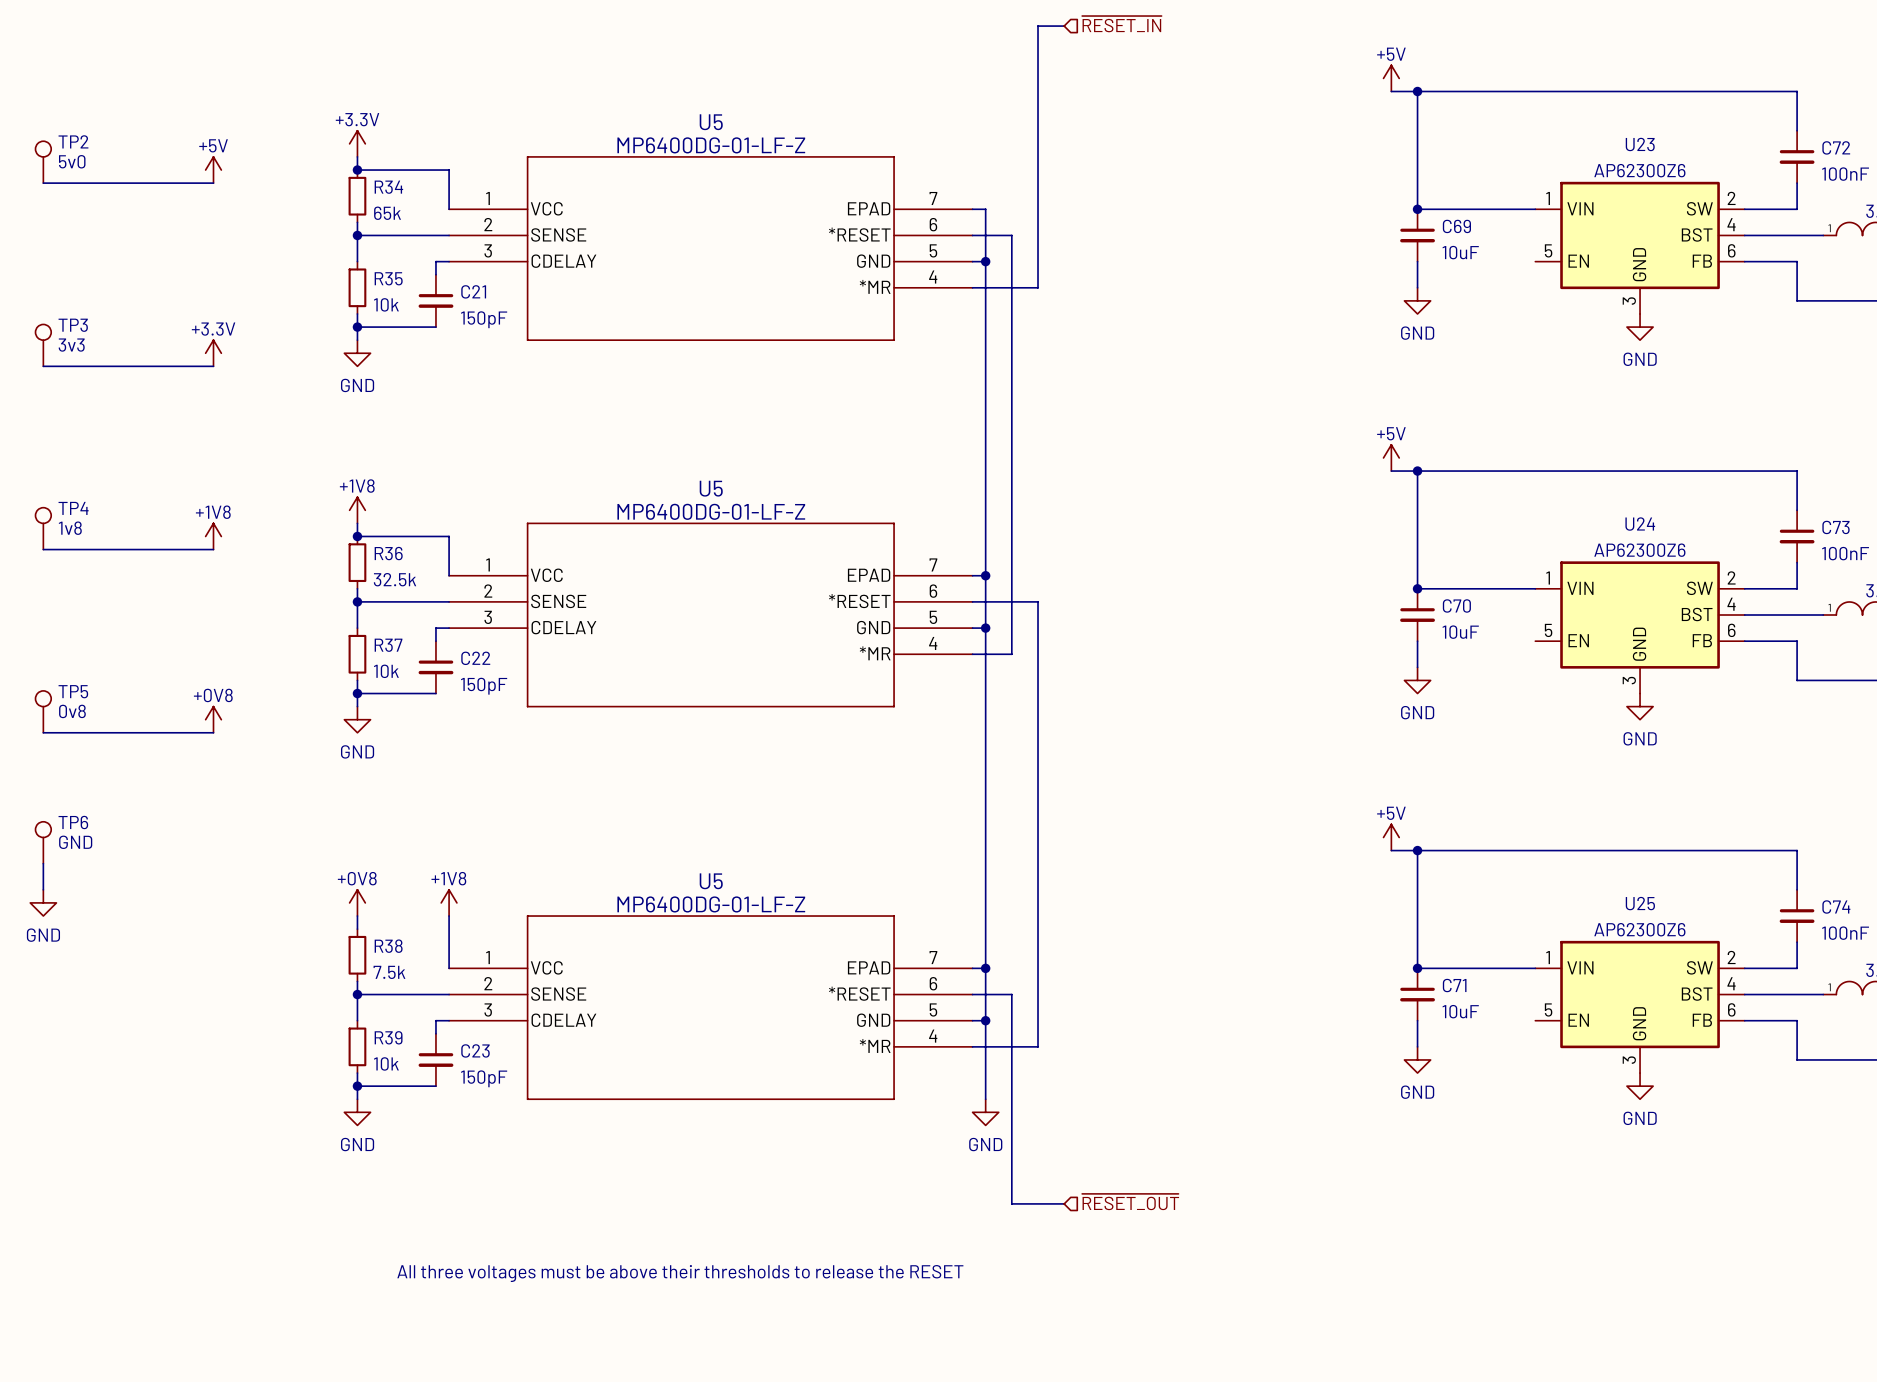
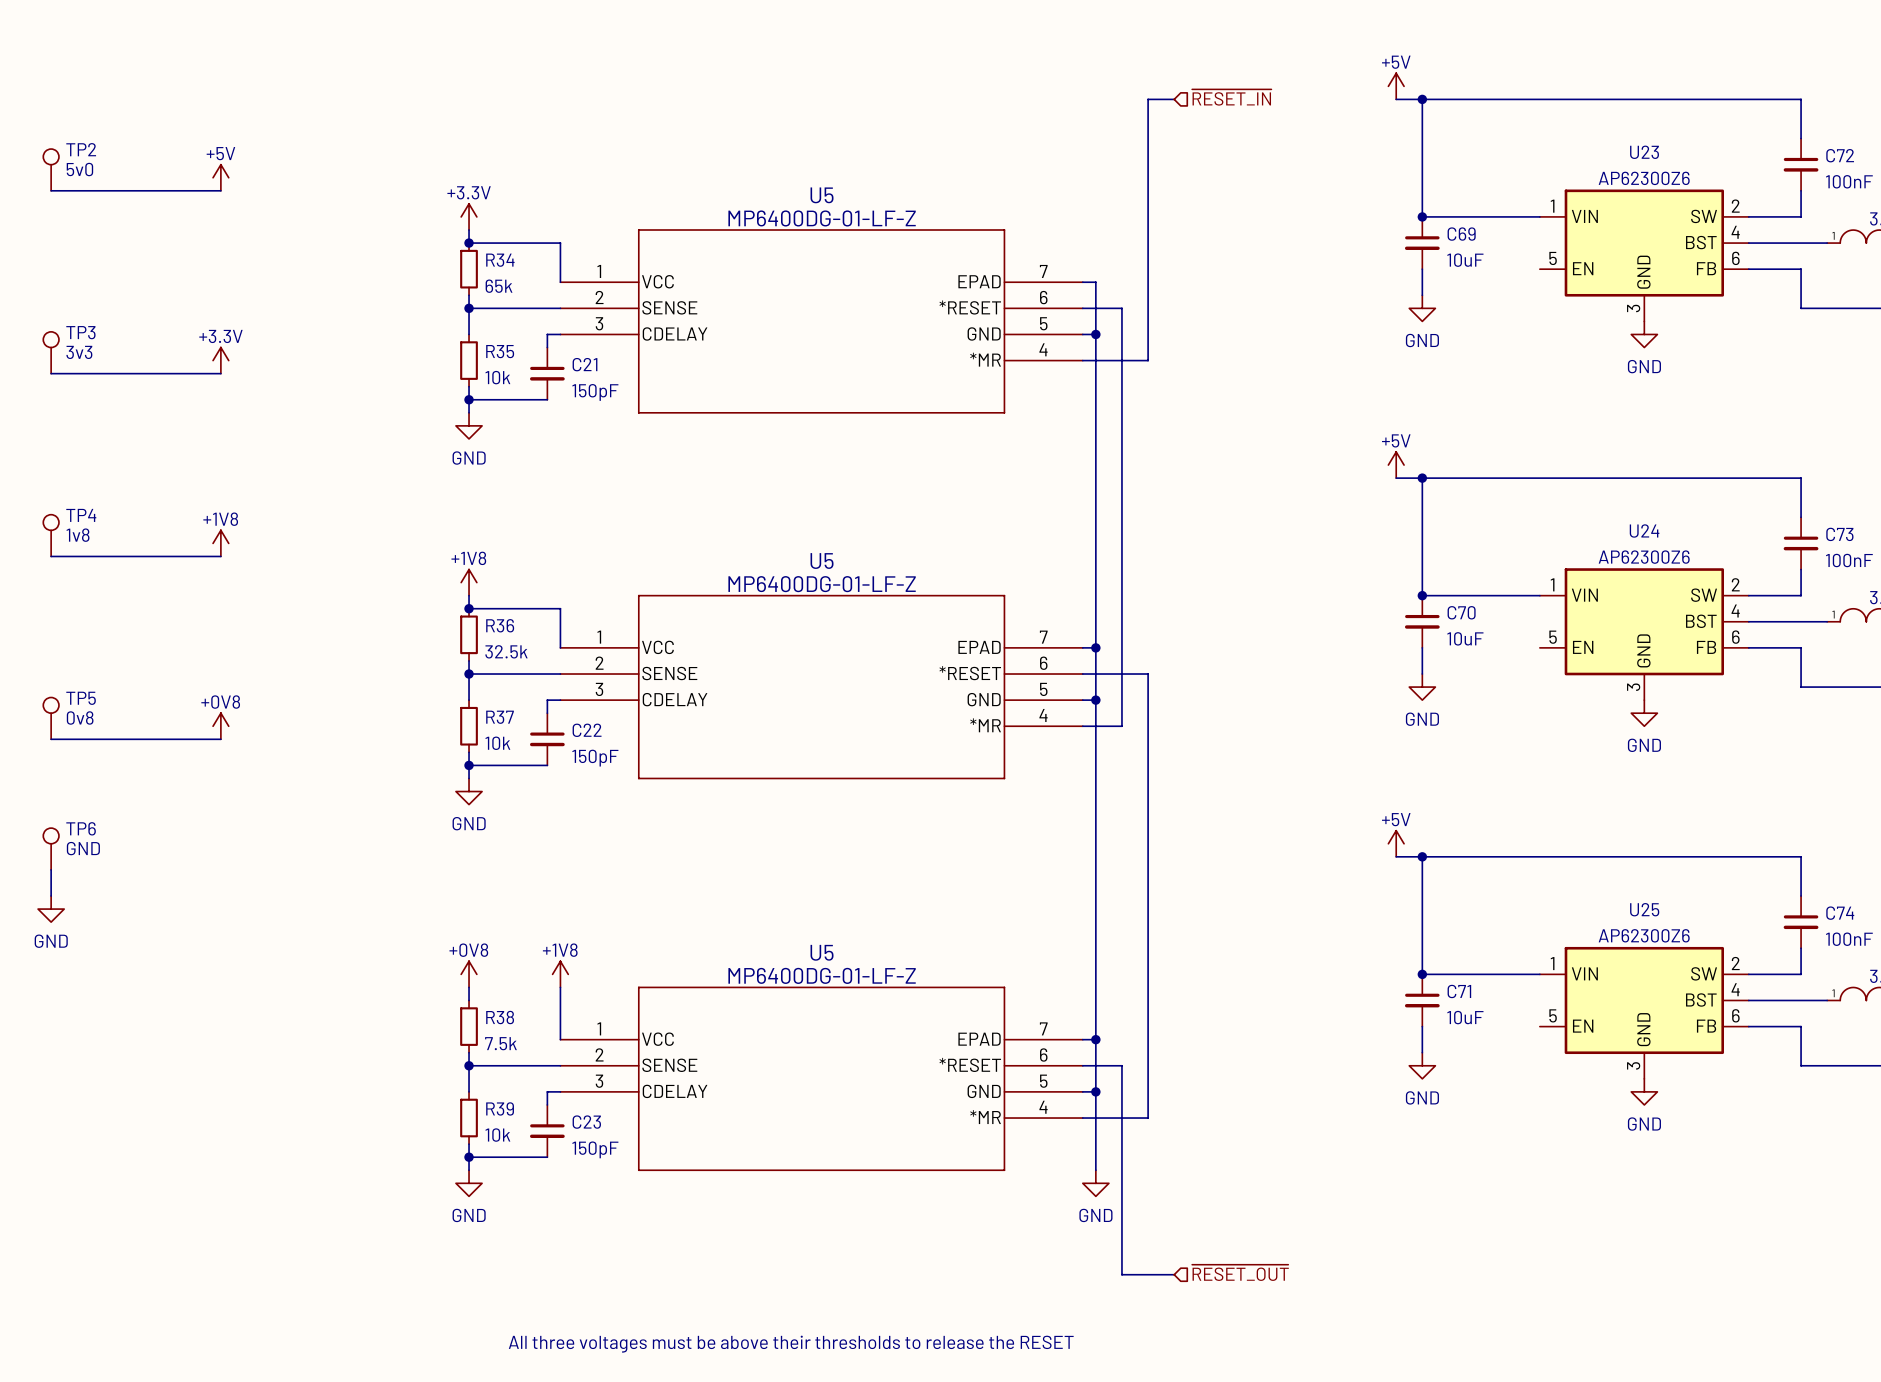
hierarchical label position: ~{RESET_IN} (1121, 24) -> ~{RESET_IN} (1231, 97)
wire: (1064, 26) (1038, 26) (1038, 287) (972, 287) -> (1174, 99) (1148, 99) (1148, 360) (1082, 360)
power symbol position: +3.3V (357, 143) -> +3.3V (469, 216)
wire: (357, 156) (357, 170) (449, 170) (449, 209) -> (469, 229) (469, 243) (560, 243) (560, 282)
junction: (357, 170) -> none
R34 position: (357, 196) -> (469, 269)
wire: (972, 209) (985, 209) (985, 1099) -> (1082, 282) (1095, 282) (1095, 1170)
wire: (357, 222) (357, 261) -> (469, 295) (469, 334)
wire: (357, 235) (449, 235) -> (469, 308) (560, 308)
junction: (357, 235) -> none
junction: none -> (469, 243)
wire: (972, 235) (1011, 235) (1011, 654) (972, 654) -> (1082, 308) (1121, 308) (1121, 726) (1082, 726)
U5 position: (710, 248) -> (821, 321)
wire: (449, 261) (435, 261) (435, 274) -> (560, 334) (547, 334) (547, 347)
wire: (972, 261) (985, 261) -> (1082, 334) (1095, 334)
junction: (985, 261) -> none
R35 position: (357, 287) -> (469, 360)
C21 position: (435, 300) -> (547, 373)
junction: none -> (469, 308)
wire: (357, 313) (357, 340) -> (469, 386) (469, 412)
wire: (357, 327) (435, 327) -> (469, 399) (547, 399)
junction: (357, 327) -> none
junction: none -> (1095, 334)
power symbol position: GND (357, 353) -> GND (469, 425)
junction: none -> (469, 399)
power symbol position: +1V8 (357, 510) -> +1V8 (469, 582)
wire: (357, 523) (357, 536) (449, 536) (449, 575) -> (469, 595) (469, 608) (560, 608) (560, 647)
junction: (357, 536) -> none
R36 position: (357, 562) -> (469, 634)
wire: (972, 575) (985, 575) -> (1082, 647) (1095, 647)
junction: (985, 575) -> none
wire: (357, 588) (357, 628) -> (469, 660) (469, 700)
wire: (357, 601) (449, 601) -> (469, 674) (560, 674)
junction: (357, 601) -> none
junction: none -> (469, 608)
wire: (972, 601) (1038, 601) (1038, 1046) (972, 1046) -> (1082, 674) (1148, 674) (1148, 1118) (1082, 1118)
U5 position: (710, 615) -> (821, 687)
wire: (449, 628) (435, 628) (435, 641) -> (560, 700) (547, 700) (547, 713)
wire: (972, 628) (985, 628) -> (1082, 700) (1095, 700)
junction: (985, 628) -> none
junction: none -> (1095, 647)
R37 position: (357, 654) -> (469, 726)
C22 position: (435, 667) -> (547, 739)
junction: none -> (469, 674)
wire: (357, 680) (357, 706) -> (469, 752) (469, 778)
wire: (357, 693) (435, 693) -> (469, 765) (547, 765)
junction: (357, 693) -> none
junction: none -> (1095, 700)
power symbol position: GND (357, 719) -> GND (469, 791)
junction: none -> (469, 765)
power symbol position: +0V8 (357, 902) -> +0V8 (469, 974)
power symbol position: +1V8 (449, 902) -> +1V8 (560, 974)
wire: (357, 916) (357, 929) -> (469, 987) (469, 1000)
wire: (449, 916) (449, 968) -> (560, 987) (560, 1039)
R38 position: (357, 955) -> (469, 1026)
wire: (972, 968) (985, 968) -> (1082, 1039) (1095, 1039)
junction: (985, 968) -> none
wire: (357, 981) (357, 1020) -> (469, 1052) (469, 1091)
wire: (357, 994) (449, 994) -> (469, 1065) (560, 1065)
junction: (357, 994) -> none
wire: (972, 994) (1011, 994) (1011, 1203) (1064, 1203) -> (1082, 1065) (1121, 1065) (1121, 1274) (1174, 1274)
U5 position: (710, 1007) -> (821, 1078)
wire: (449, 1020) (435, 1020) (435, 1033) -> (560, 1091) (547, 1091) (547, 1104)
wire: (972, 1020) (985, 1020) -> (1082, 1091) (1095, 1091)
junction: (985, 1020) -> none
junction: none -> (1095, 1039)
R39 position: (357, 1046) -> (469, 1118)
C23 position: (435, 1059) -> (547, 1131)
junction: none -> (469, 1065)
wire: (357, 1073) (357, 1099) -> (469, 1144) (469, 1170)
wire: (357, 1086) (435, 1086) -> (469, 1157) (547, 1157)
junction: (357, 1086) -> none
junction: none -> (1095, 1091)
power symbol position: GND (357, 1112) -> GND (469, 1183)
power symbol position: GND (985, 1112) -> GND (1095, 1183)
junction: none -> (469, 1157)
hierarchical label position: ~{RESET_OUT} (1130, 1202) -> ~{RESET_OUT} (1240, 1272)
text position: All three voltages must be above their thresholds to release the RESET (680, 1273) -> All three voltages must be above their thresholds to release the RESET (791, 1344)

